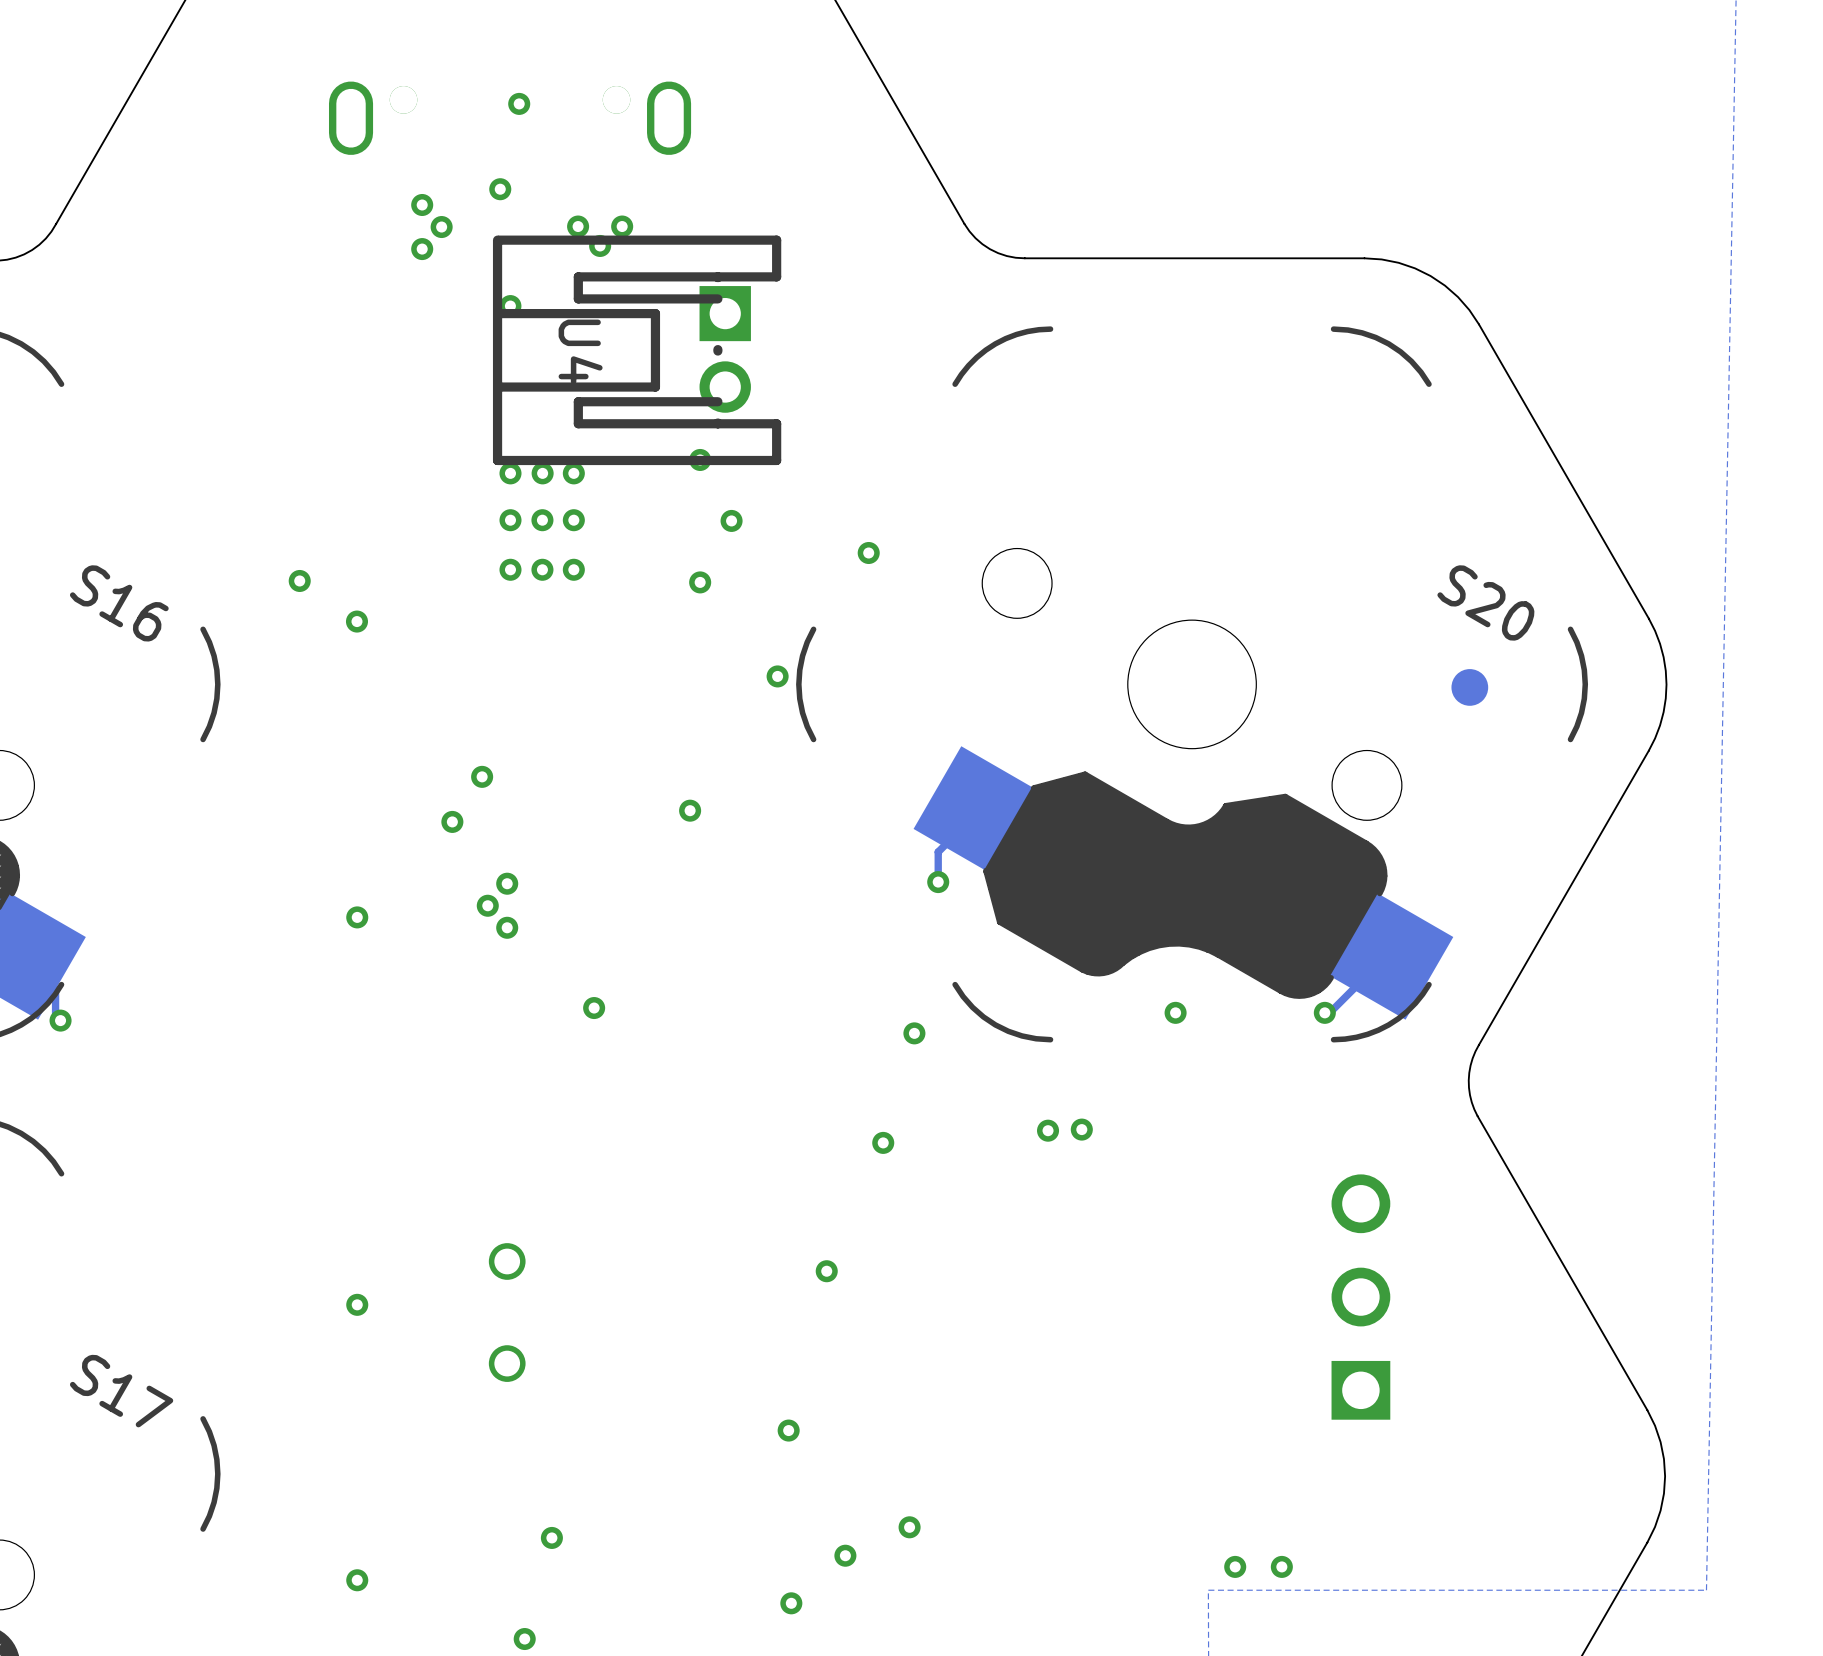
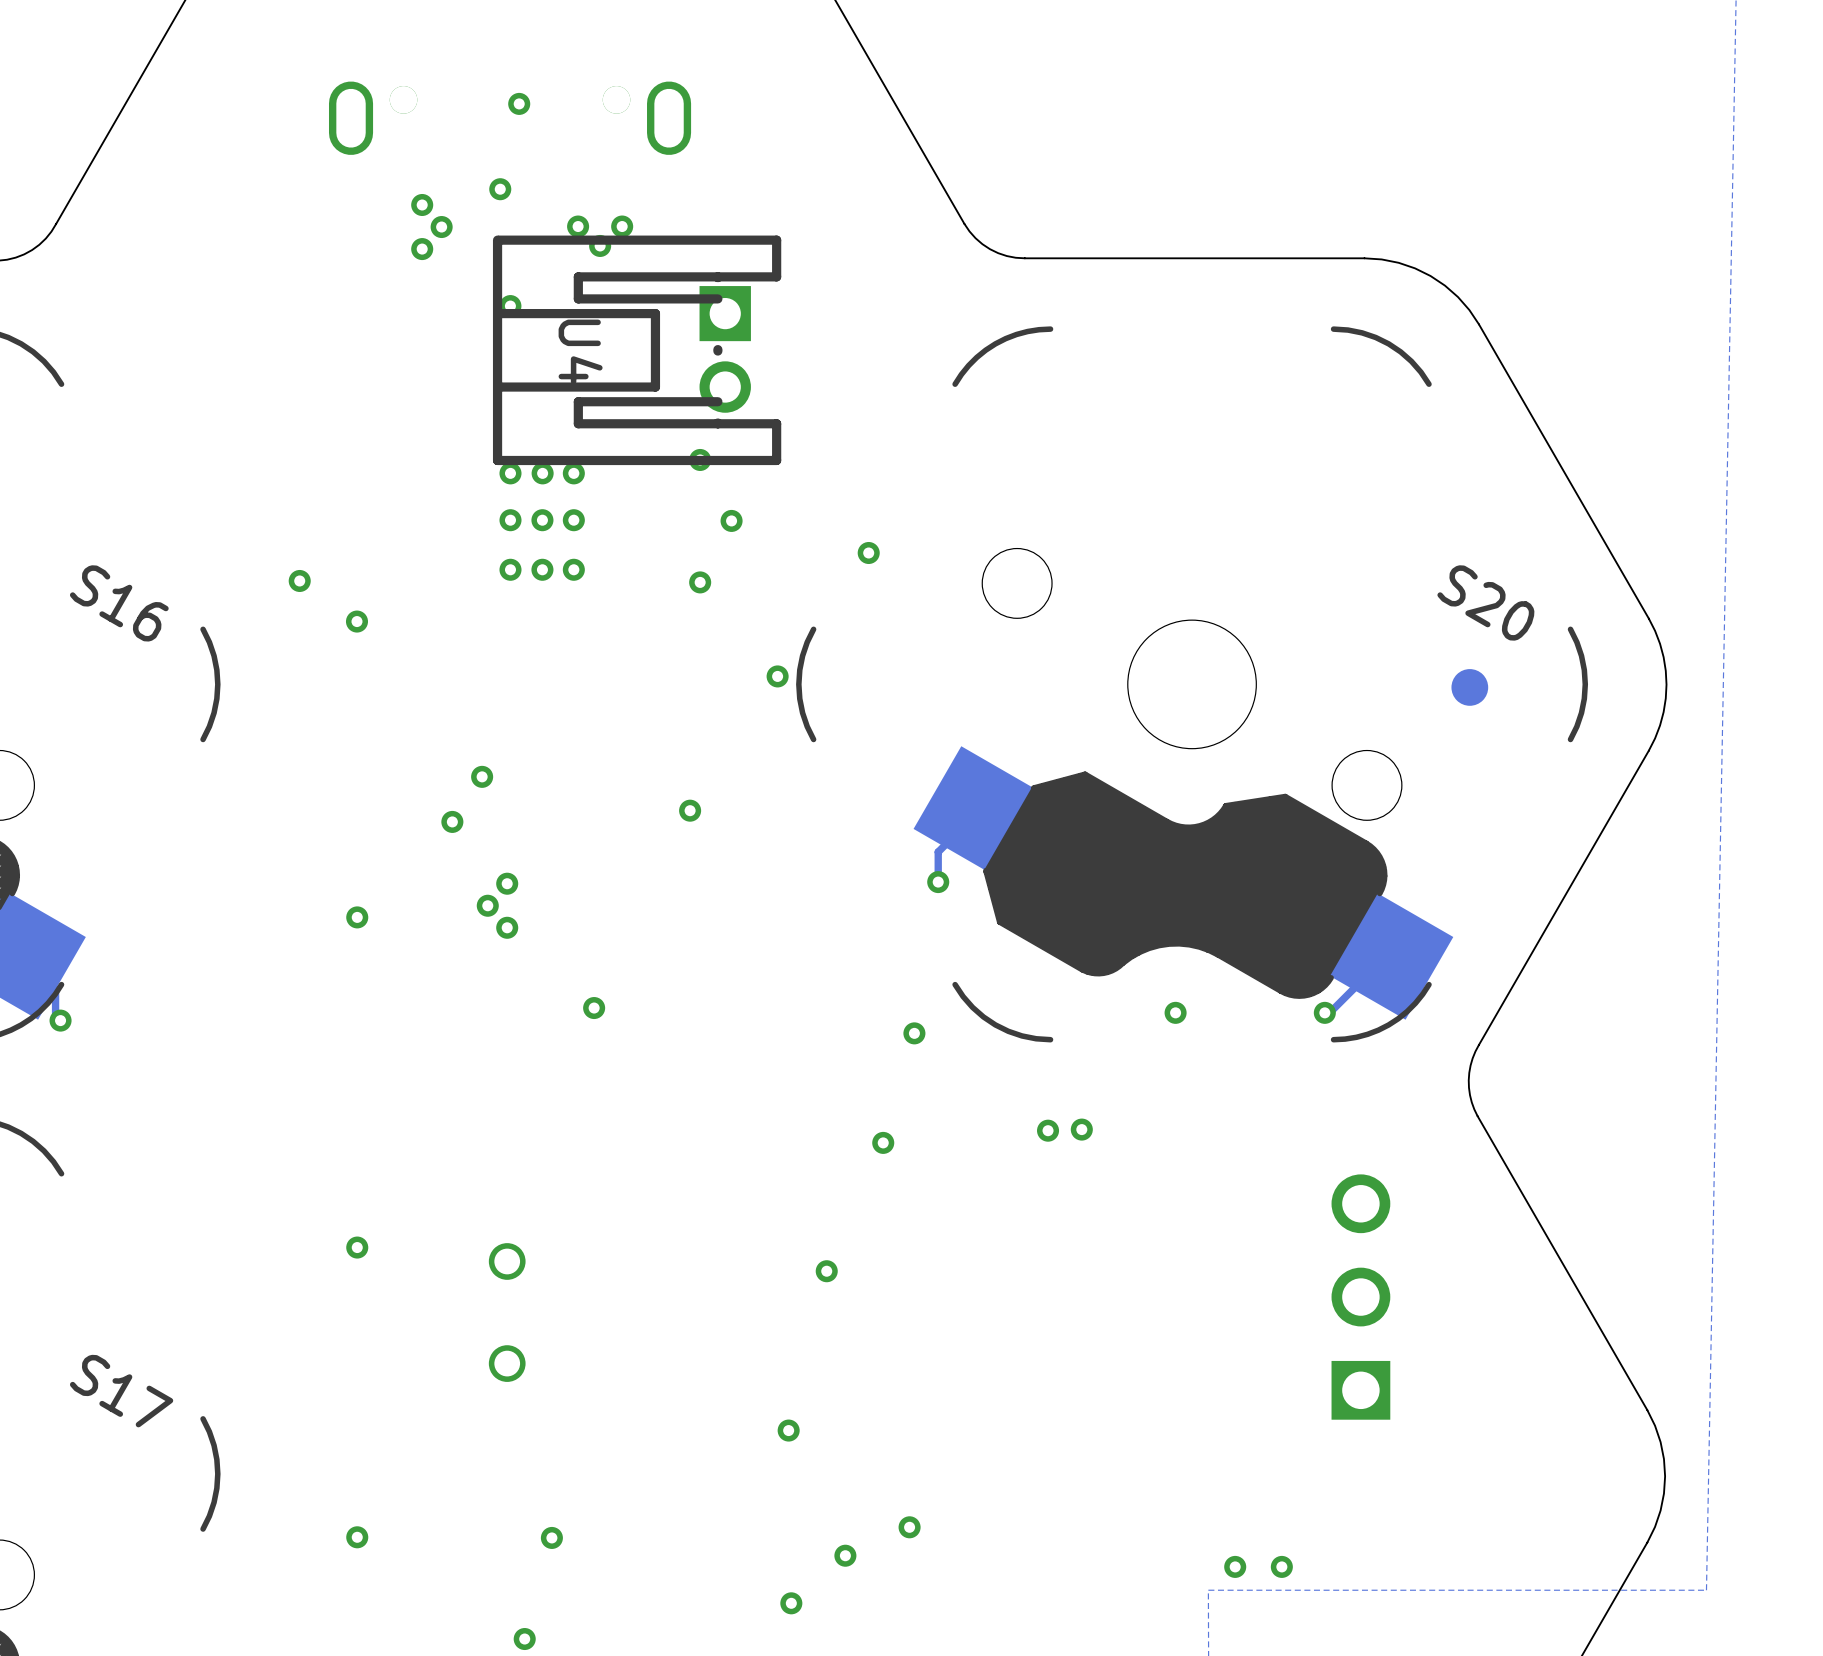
via position: (357, 1304) -> (357, 1247)
via position: (357, 1580) -> (357, 1537)

